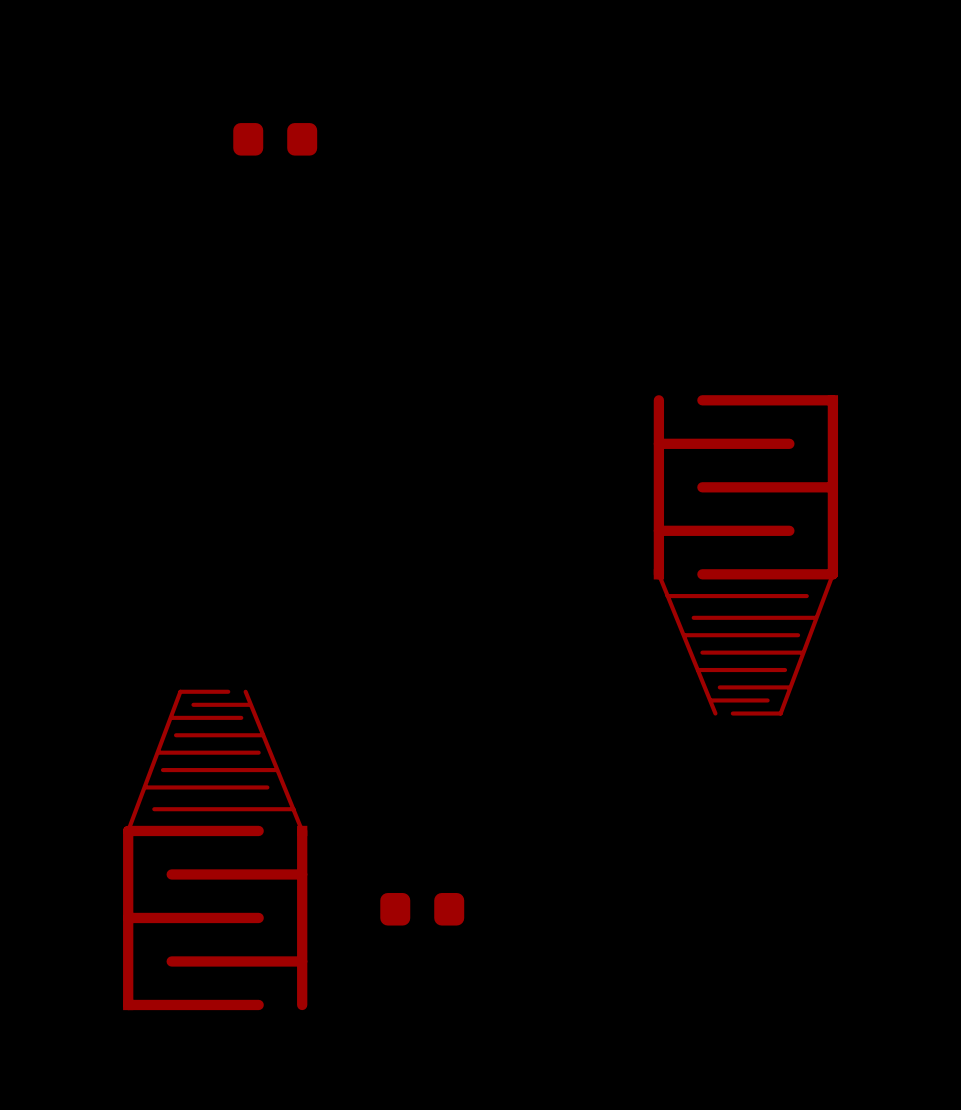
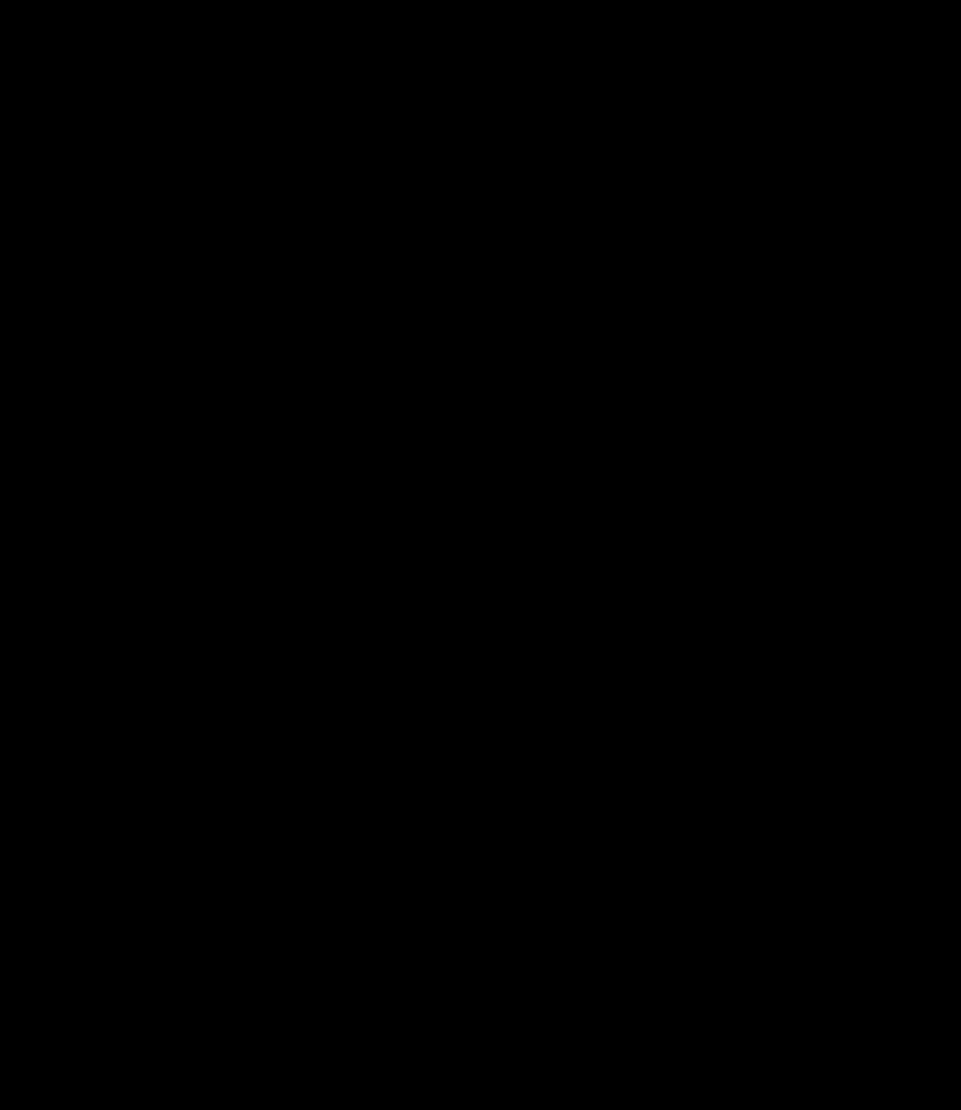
part: (275, 139) -> none
part: (745, 555) -> none
part: (215, 849) -> none
part: (422, 909) -> none

